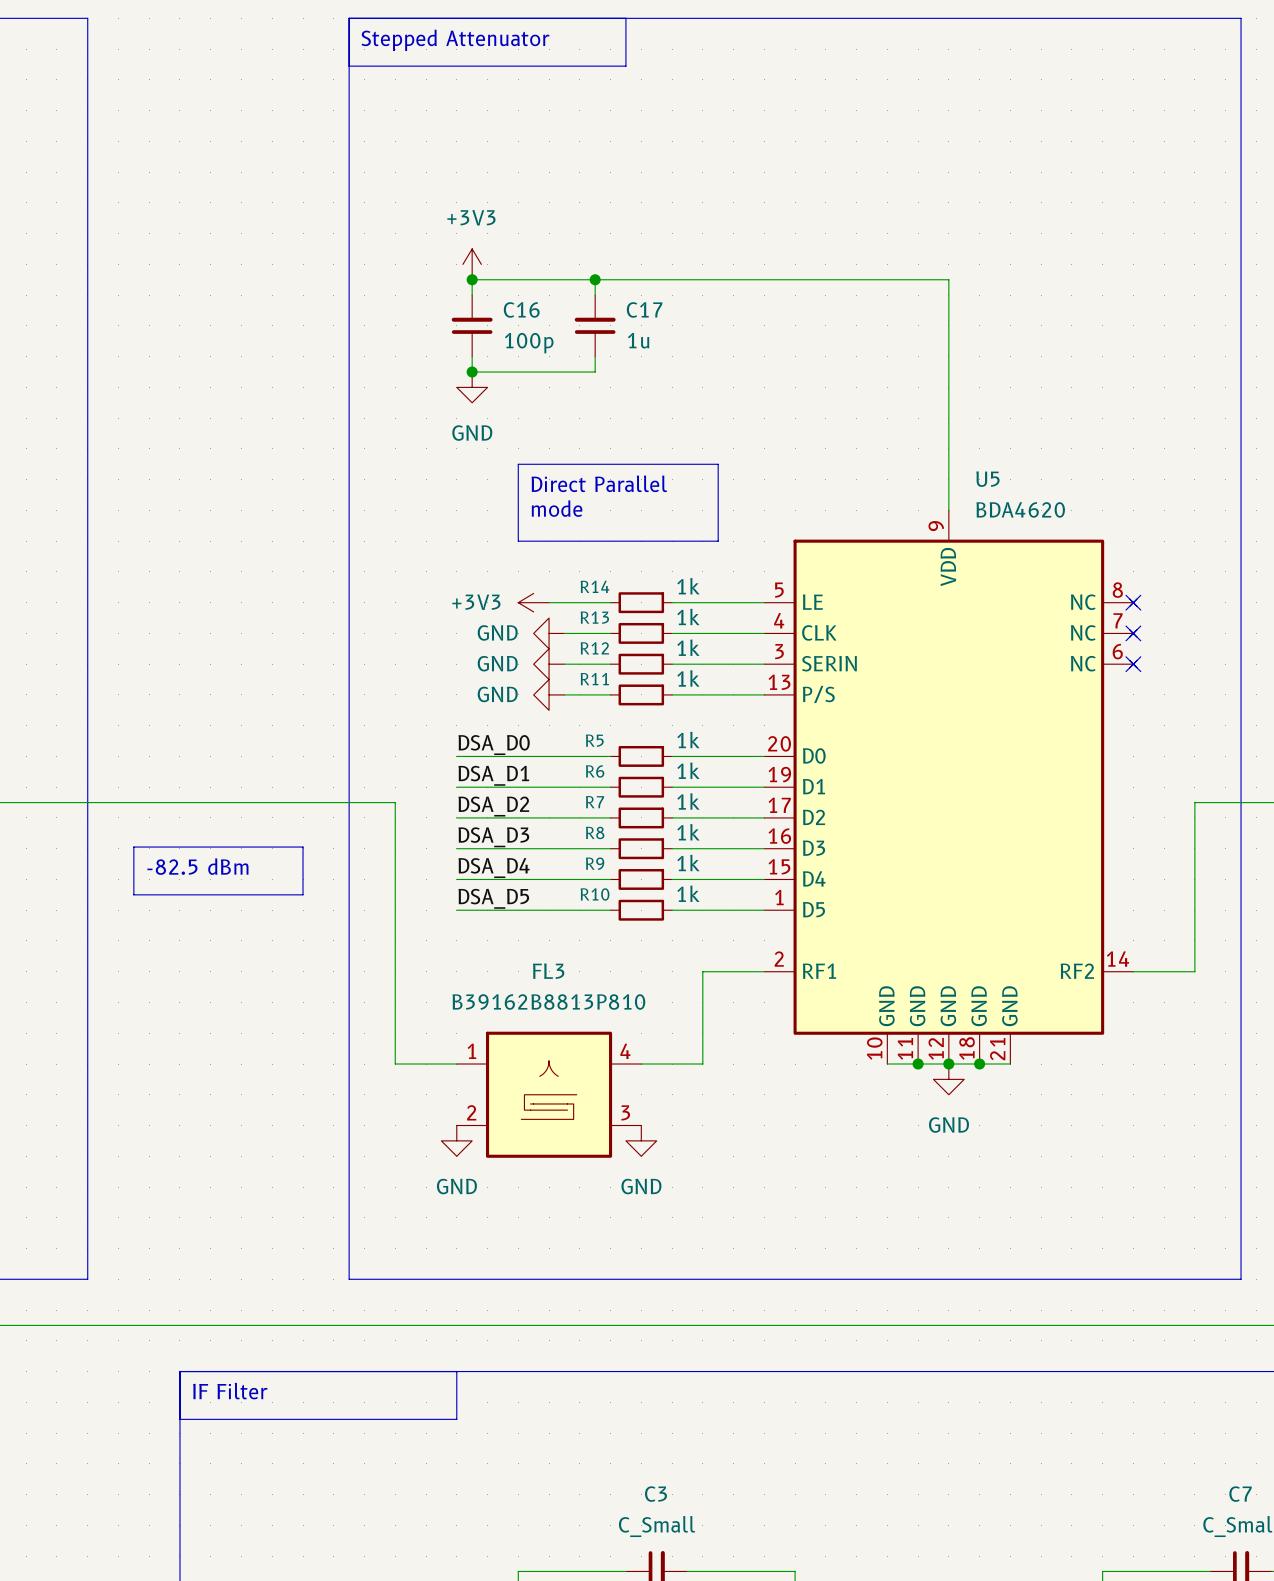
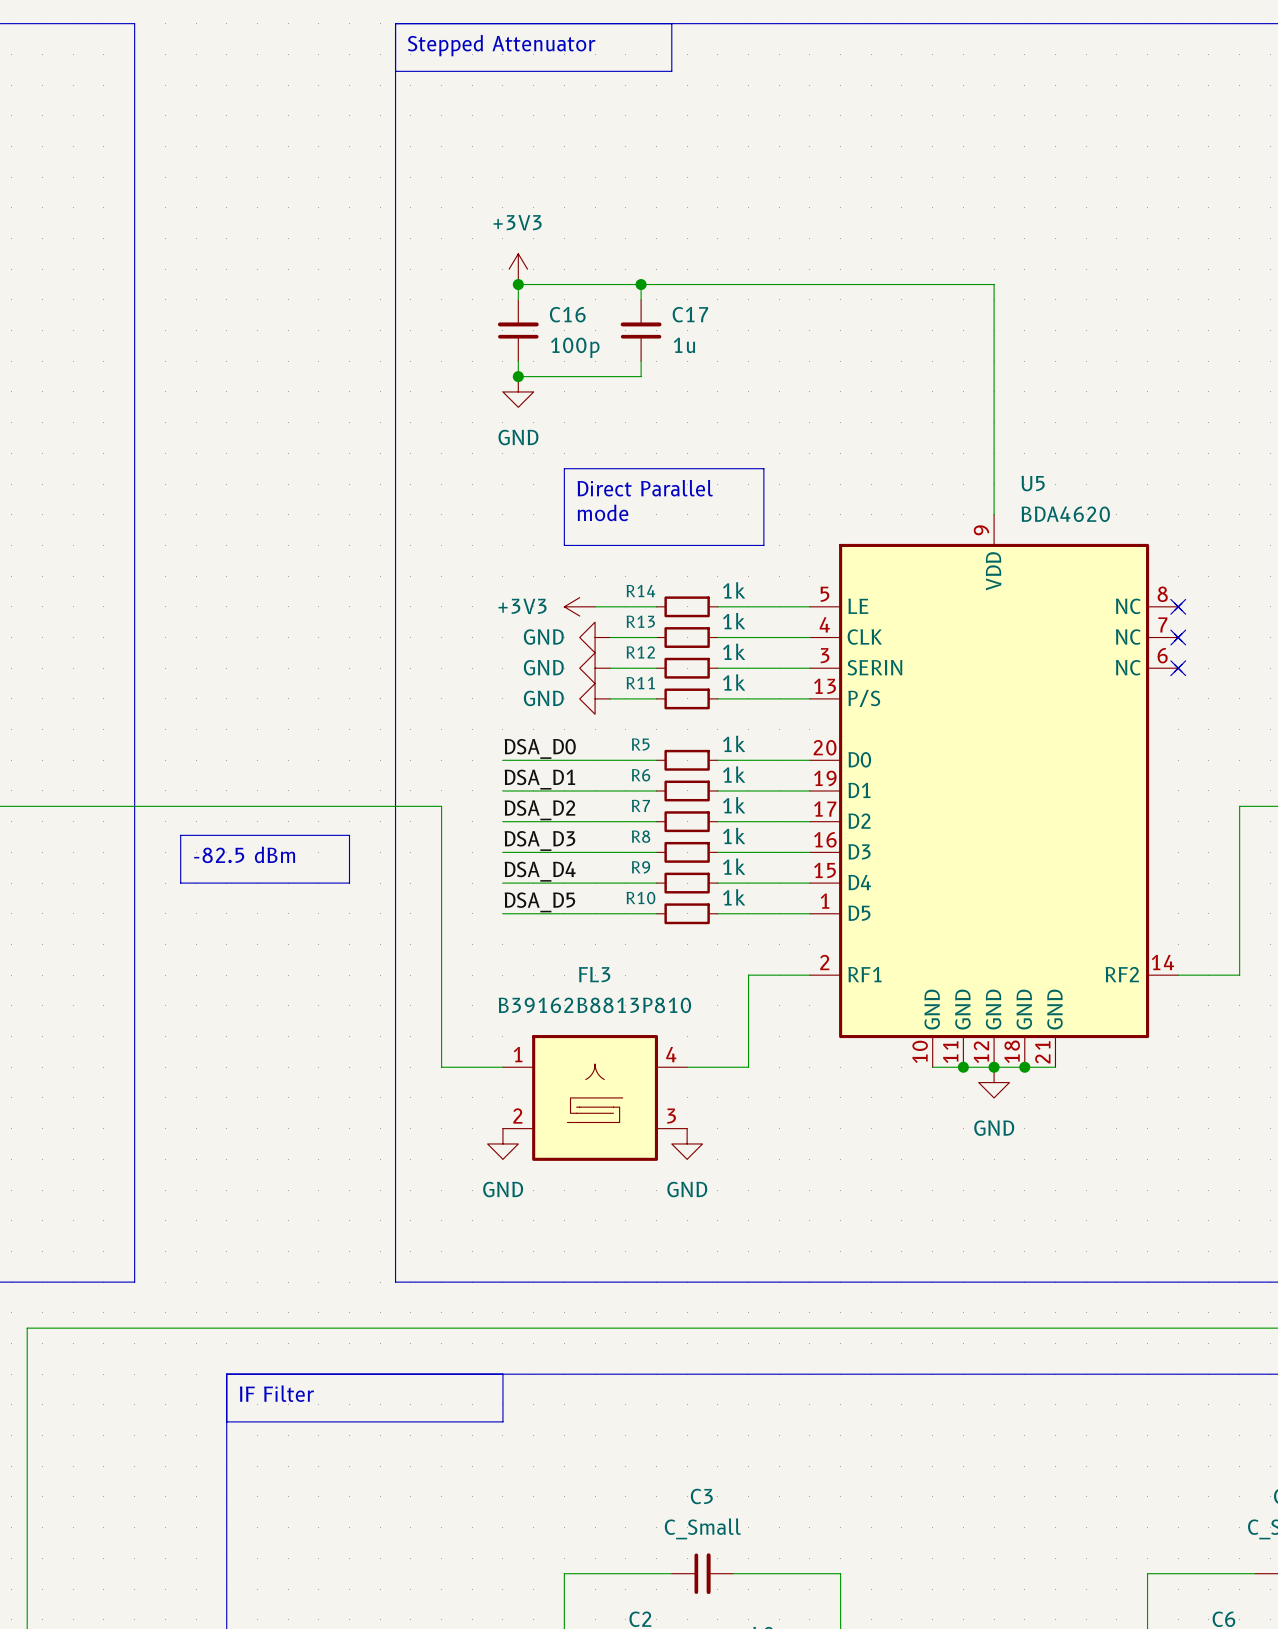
line: (133, 847) (303, 847) -> (180, 850) (180, 835) (349, 835) (349, 850)
text position: -82.5 dBm (197, 866) -> -82.5 dBm (244, 854)
line: (133, 879) (133, 894) (303, 894) (303, 879) -> (180, 883) (349, 883)

